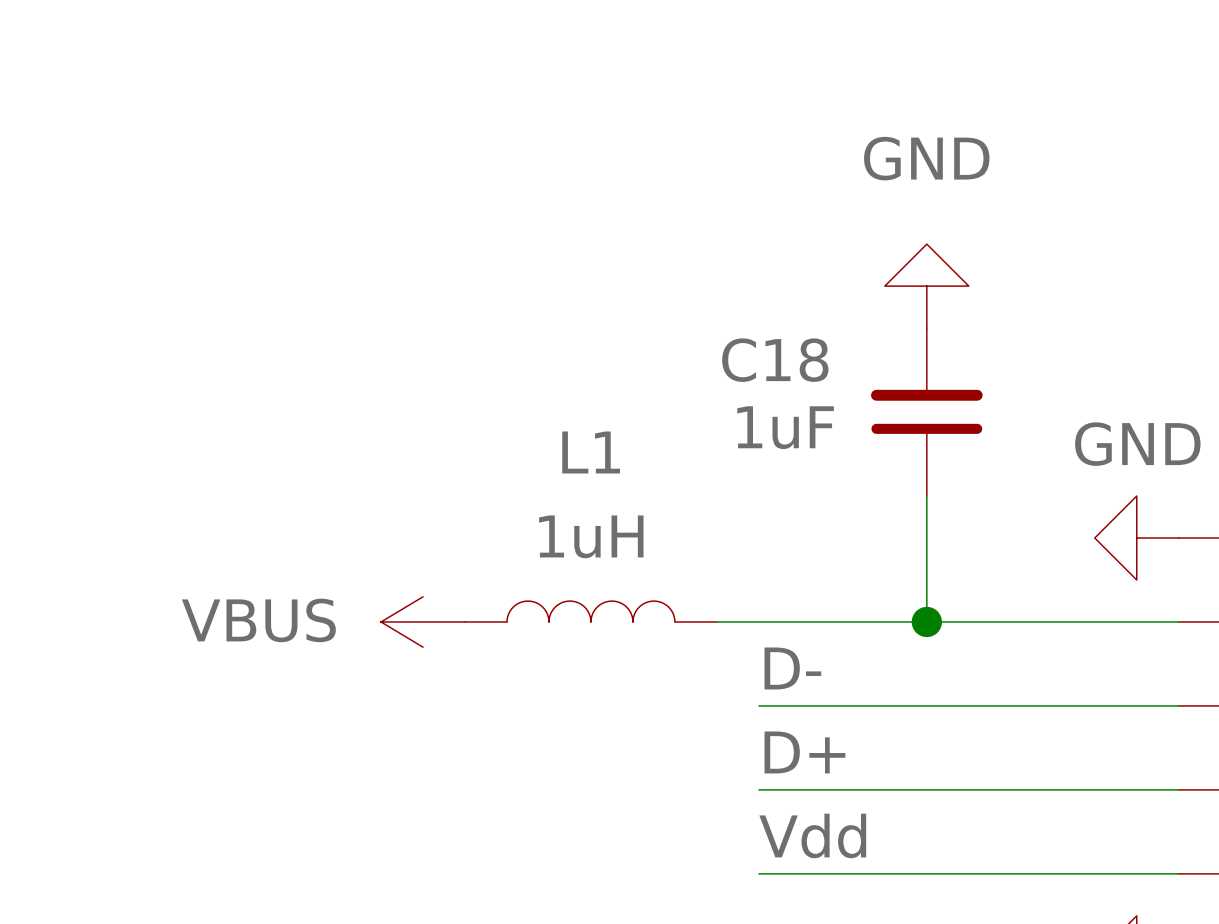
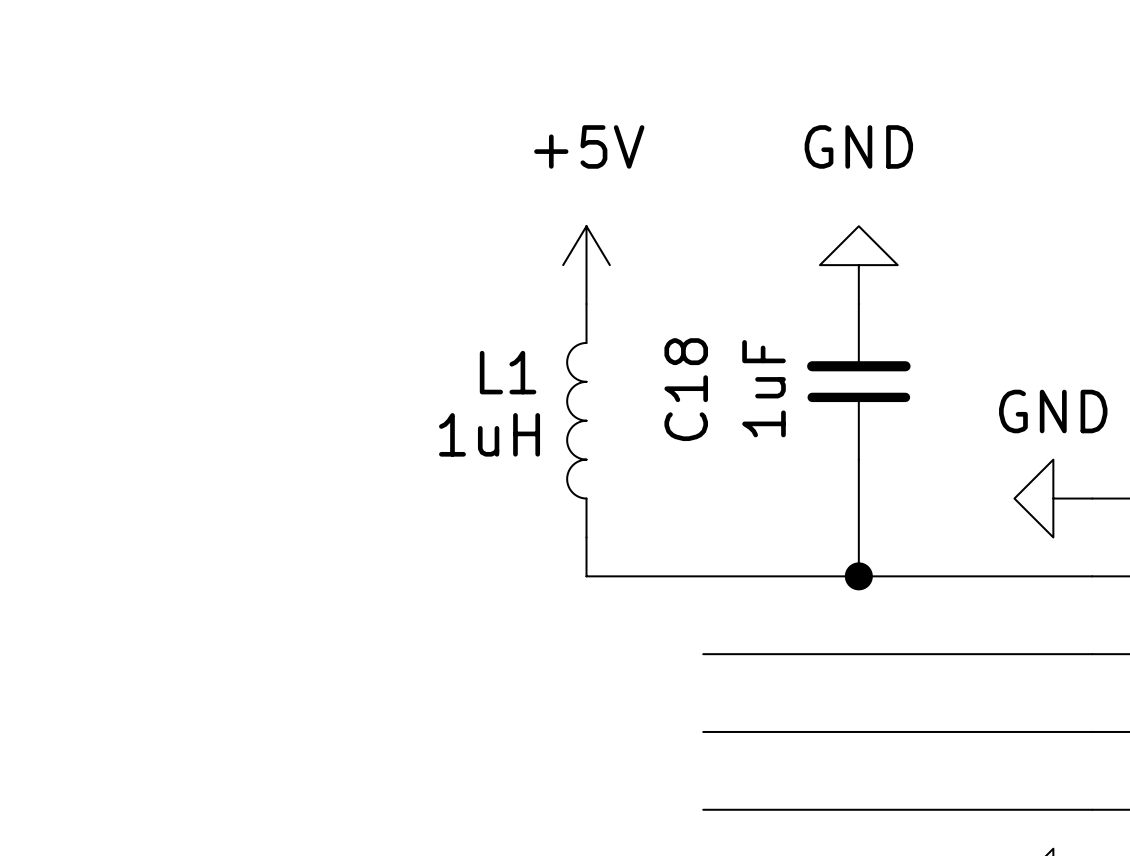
power symbol: none -> +5V (586, 265)
C18 name rotation: 0° (775, 360) -> 90° counterclockwise (686, 389)
C18 value rotation: 0° (785, 427) -> 90° counterclockwise (764, 388)
L1 name position: L1 (591, 452) -> L1 (508, 372)
wire: none -> (586, 537) (586, 576) (664, 576)
L1 rotation: 0° (590, 611) -> 90° counterclockwise (576, 420)
L1 position: (590, 611) -> (576, 420)
power symbol: VBUS (423, 621) -> none
label: D- (792, 668) -> none
label: D+ (804, 752) -> none
label: Vdd (812, 835) -> none

